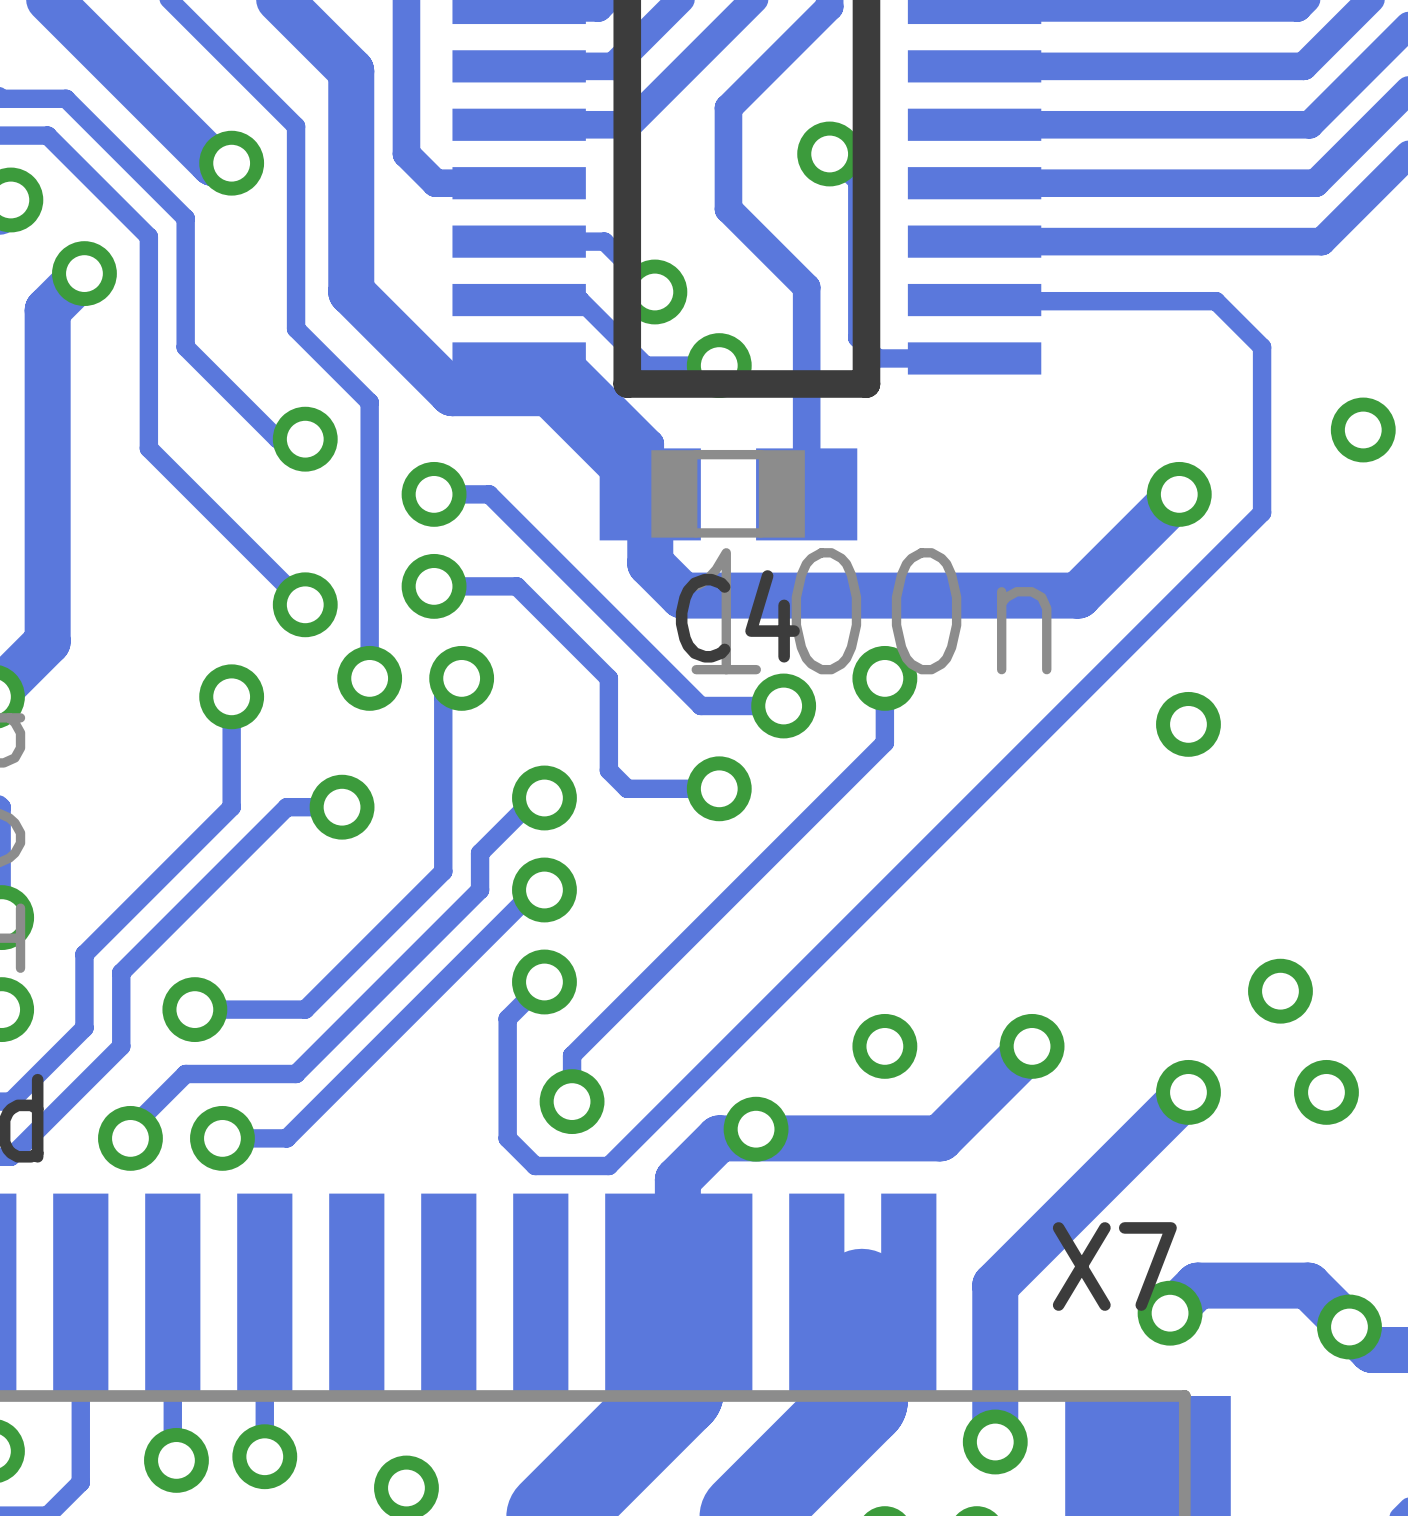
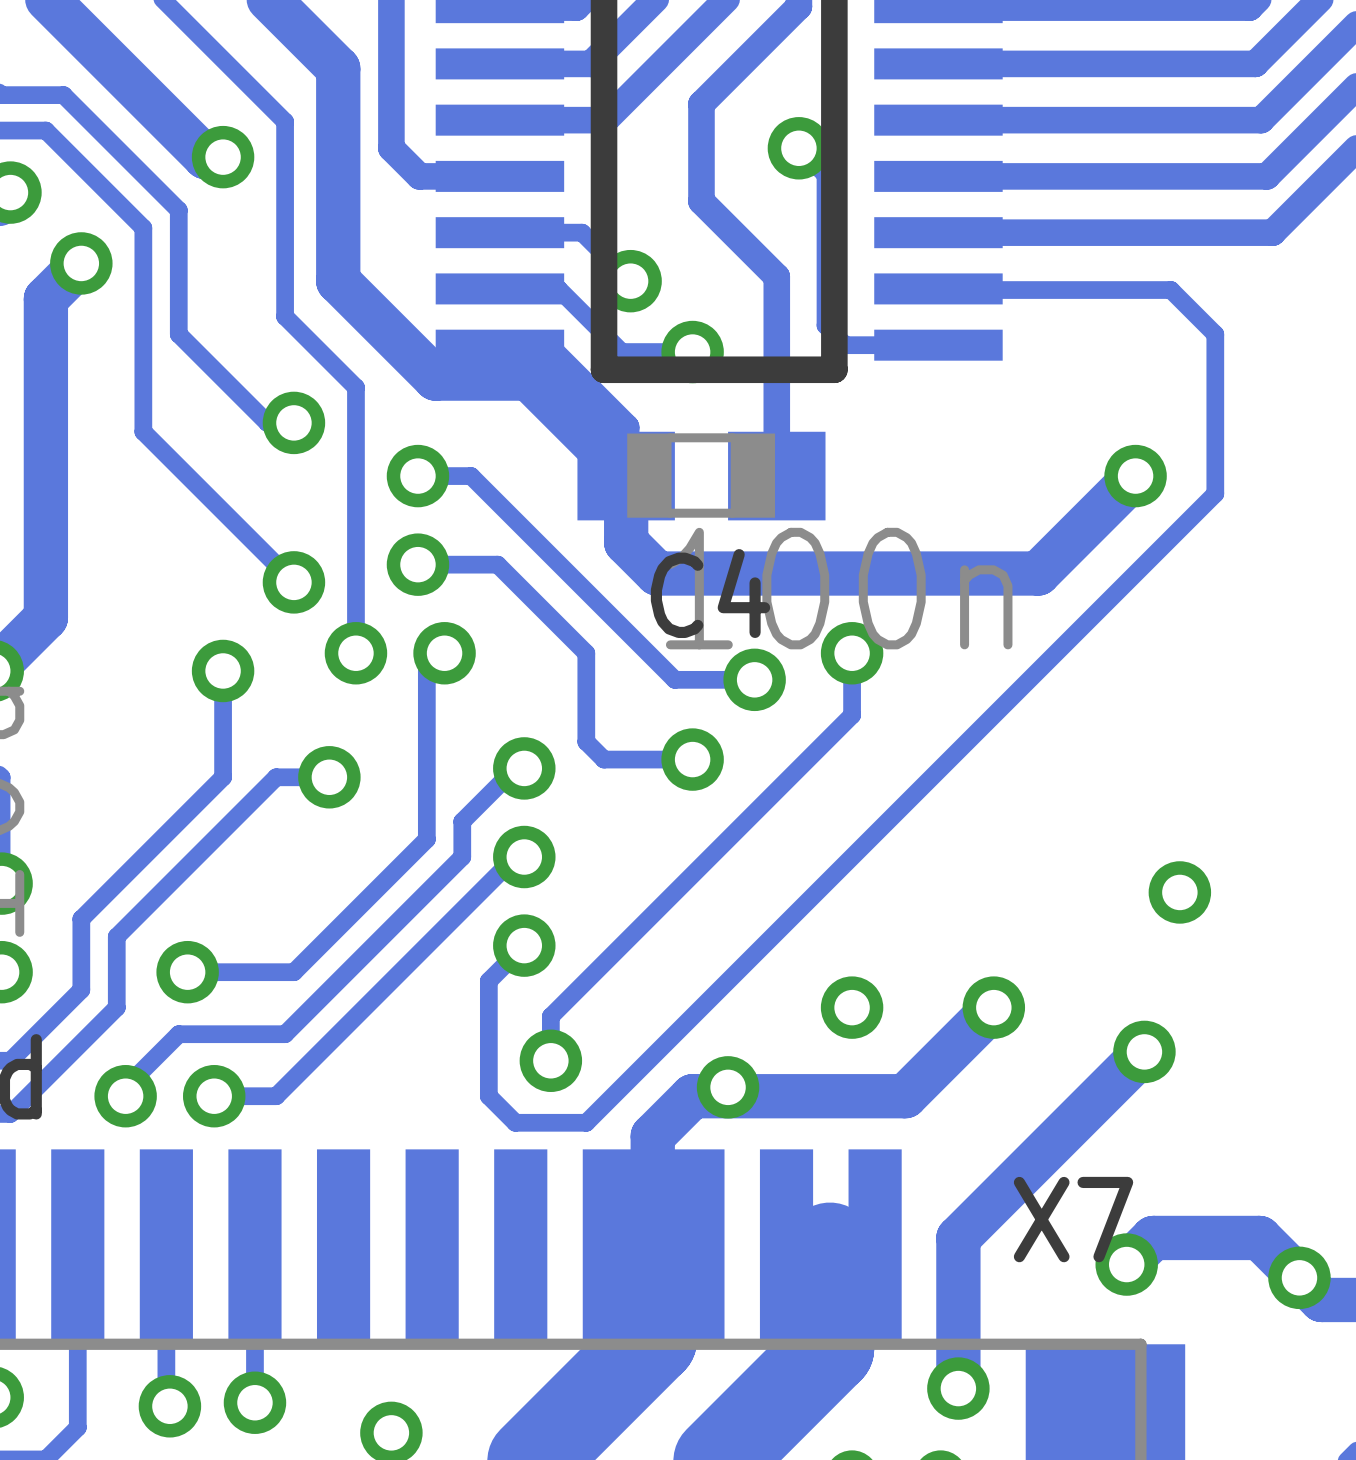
via: (1363, 429) -> none
via: (1188, 724) -> none
via position: (1280, 991) -> (1179, 892)
via: (1326, 1092) -> none

